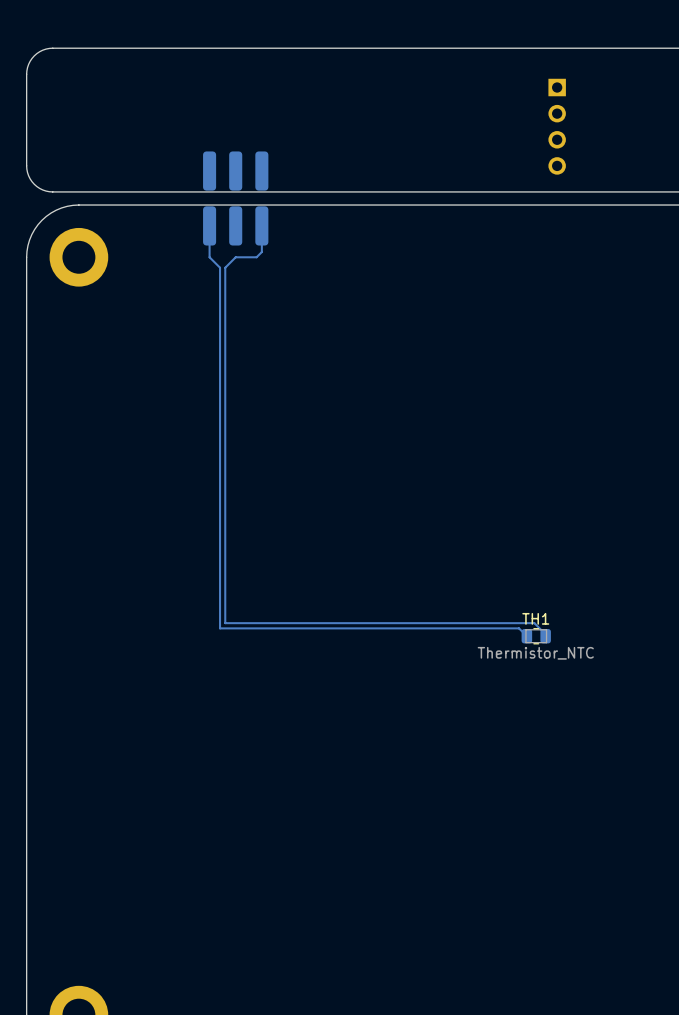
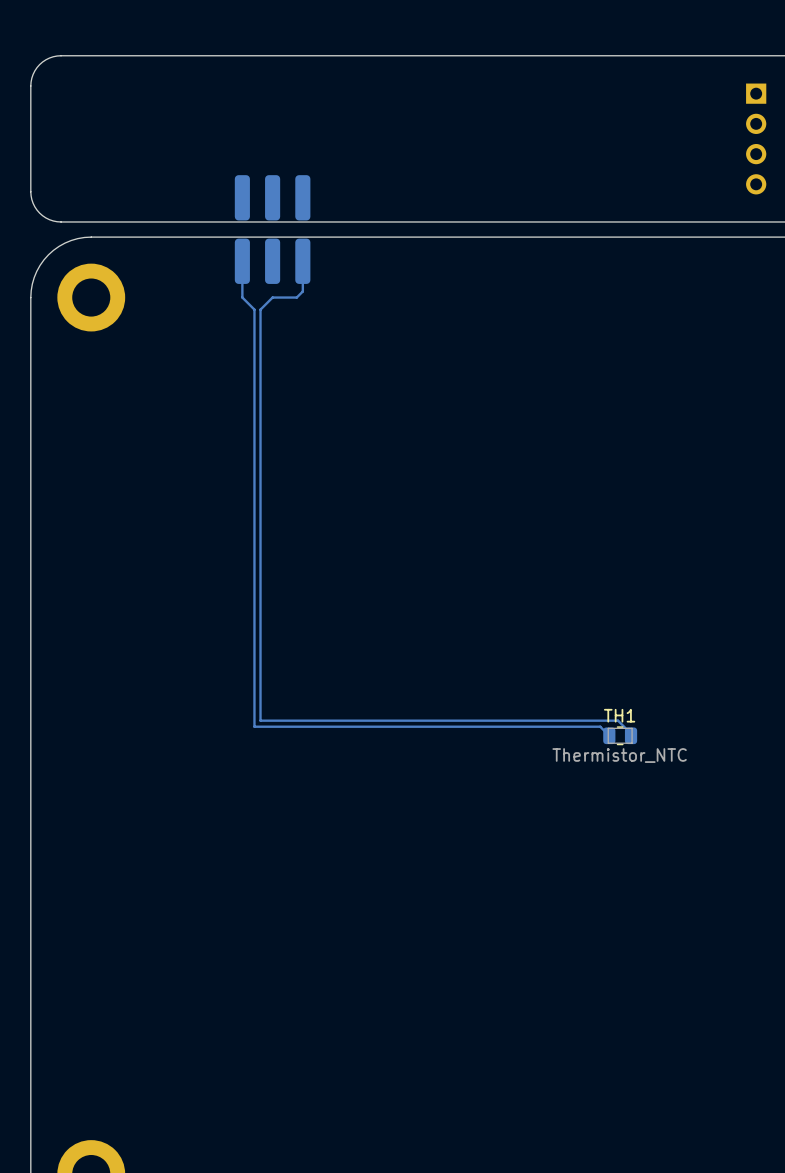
part position: (557, 126) -> (756, 138)

